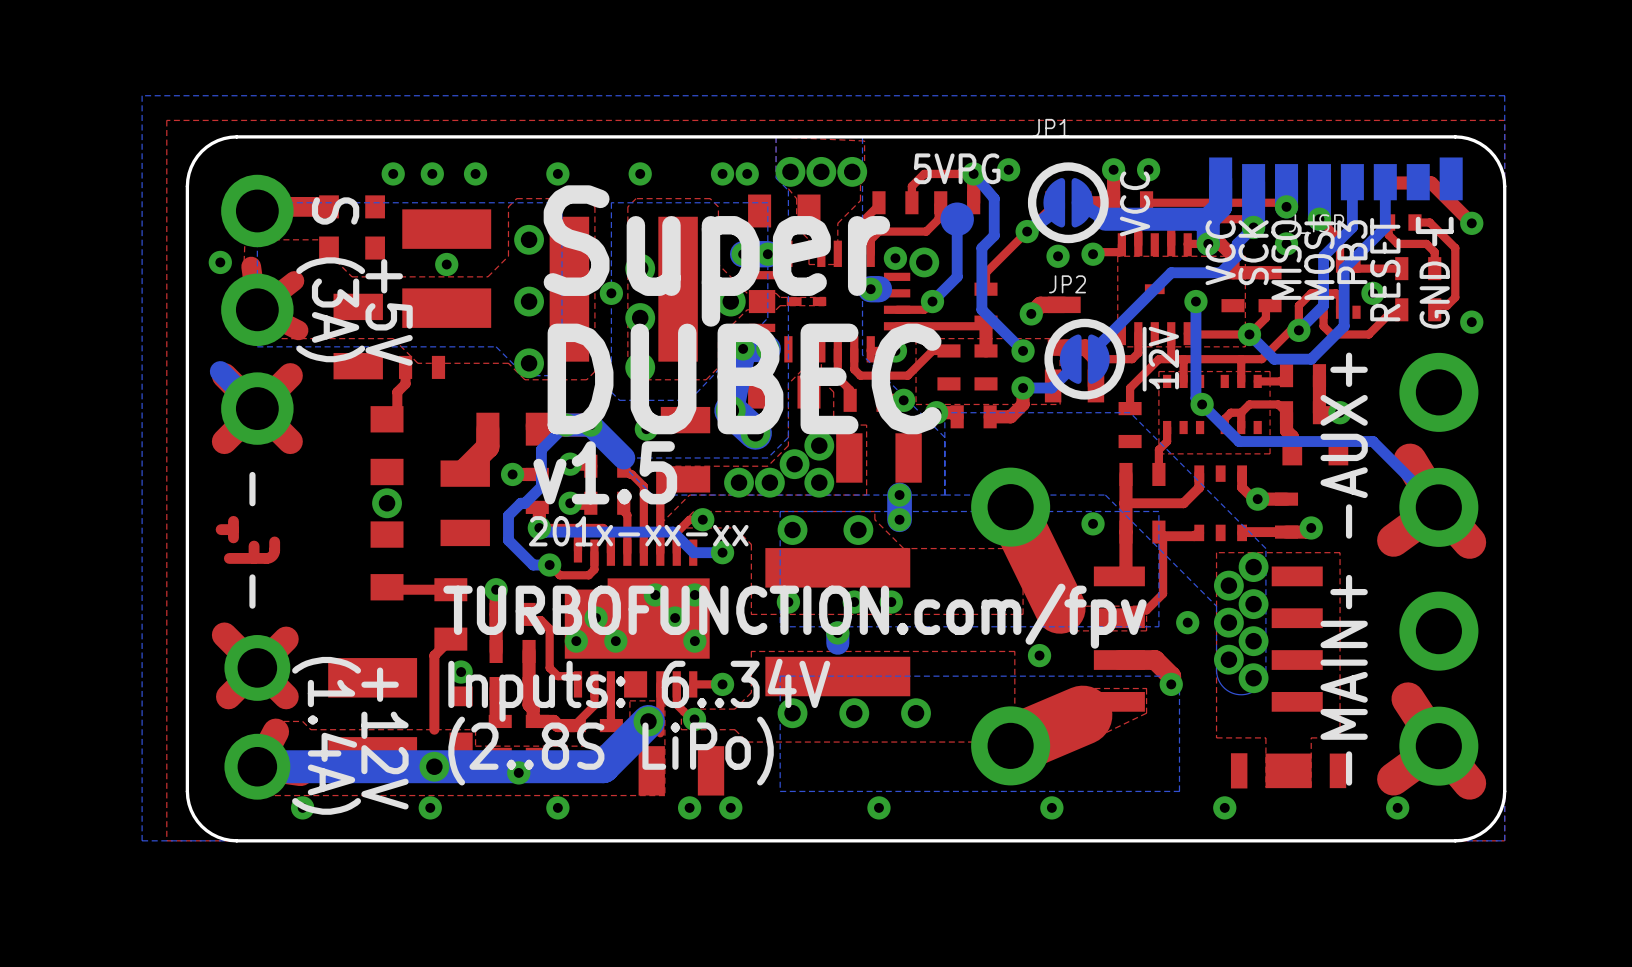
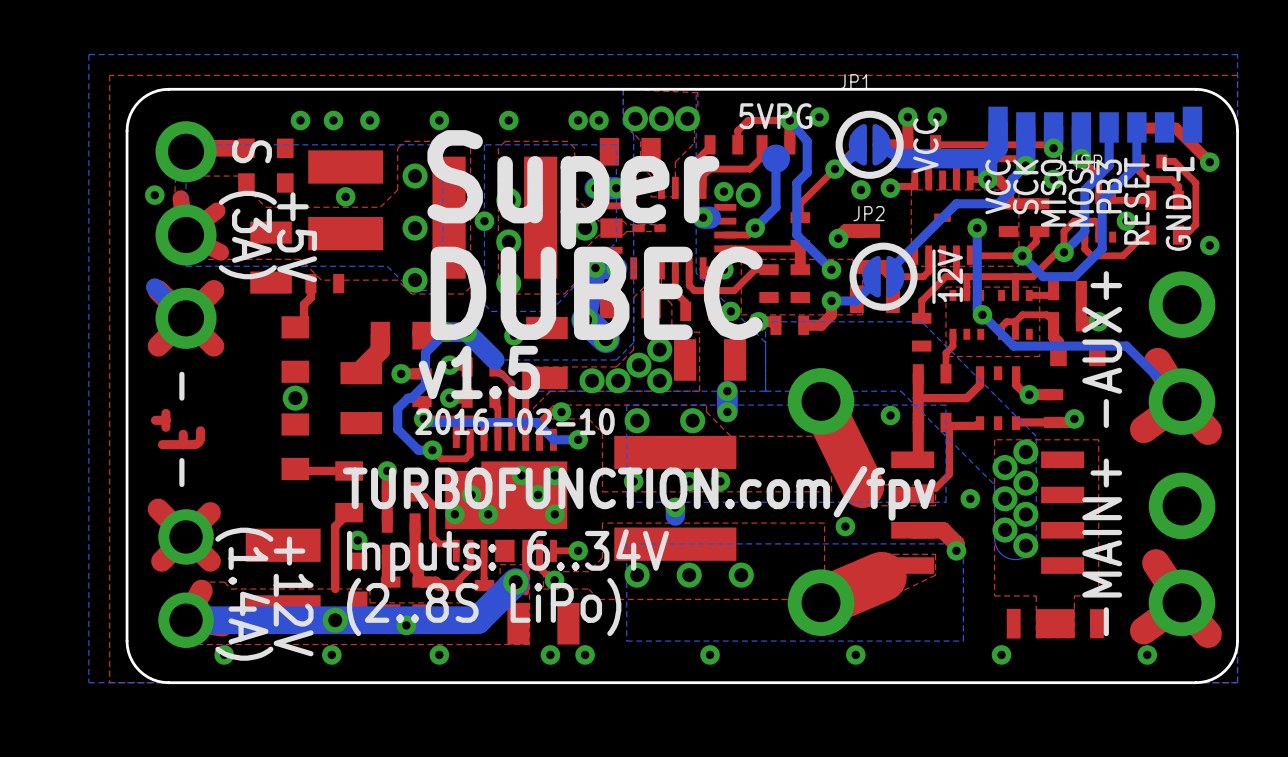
text: 201x-xx-xx (638, 531) -> 2016-02-10 (514, 421)

